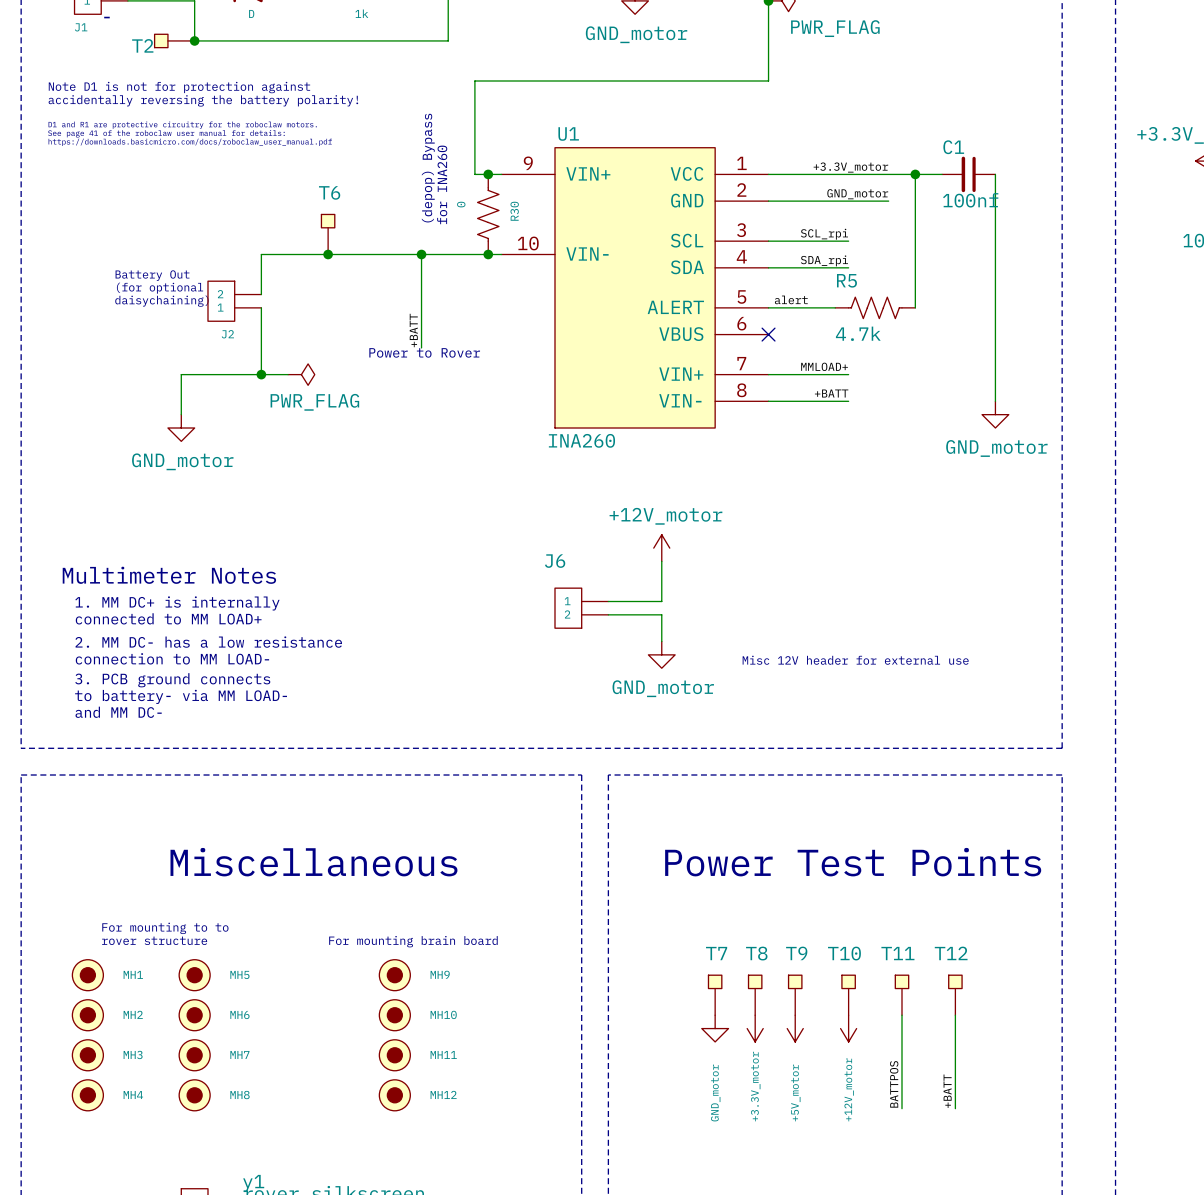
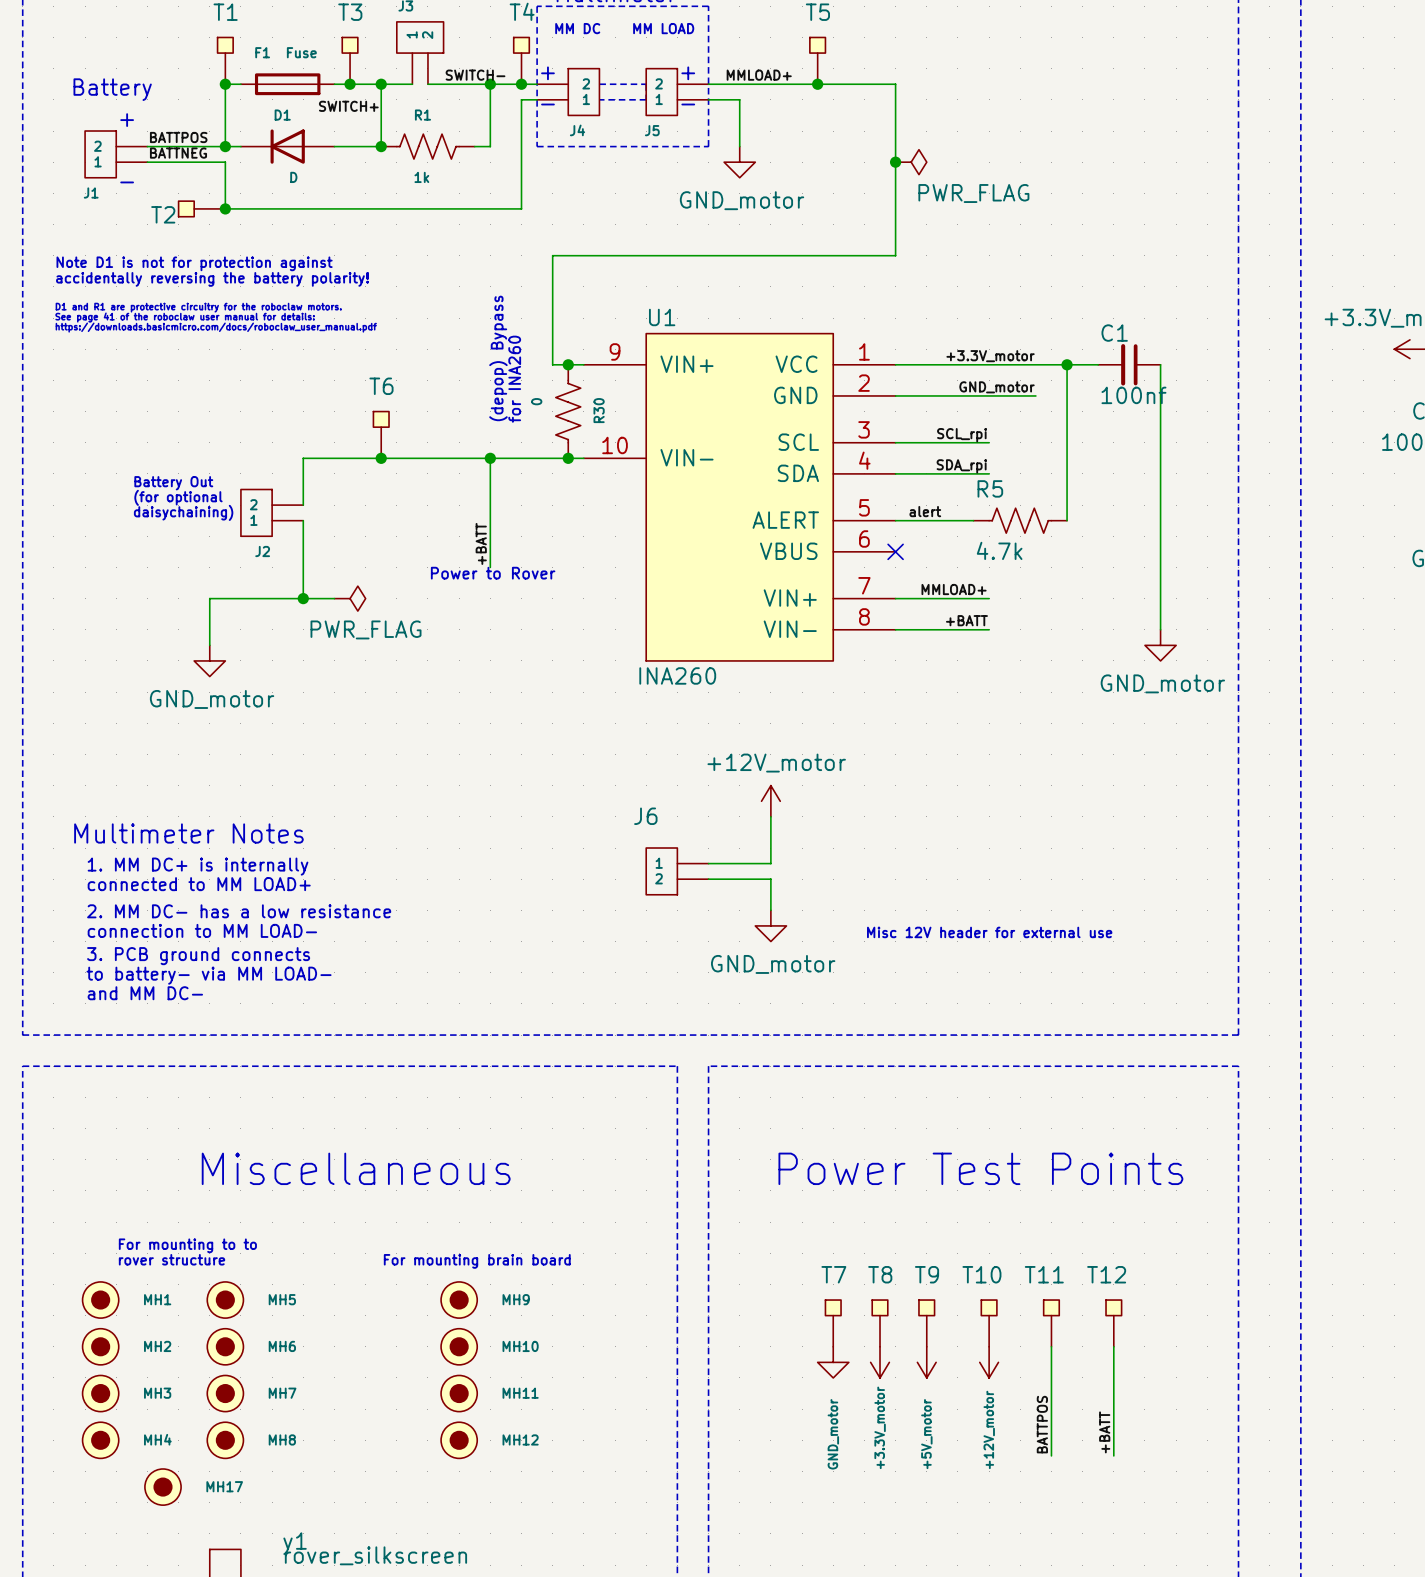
MH17: none -> (163, 1487)

